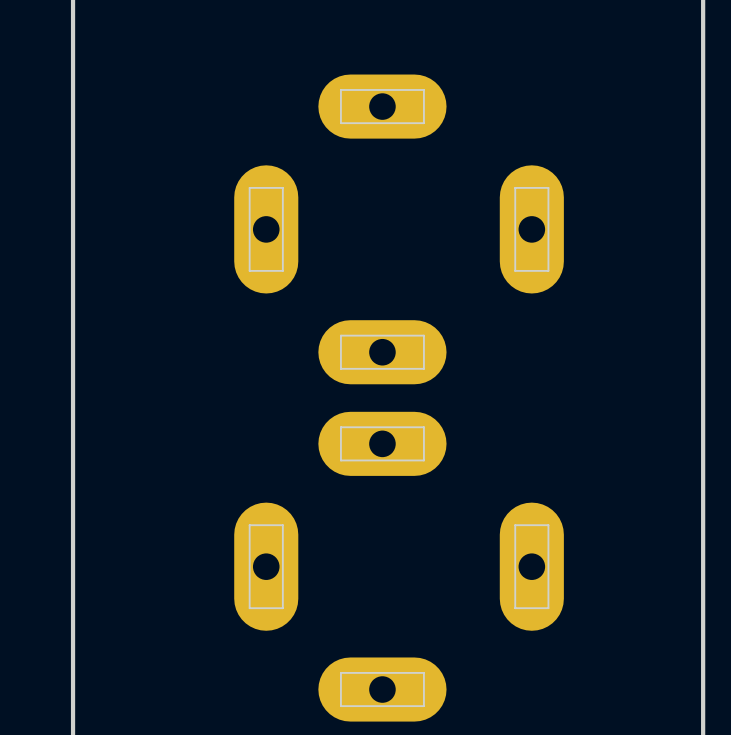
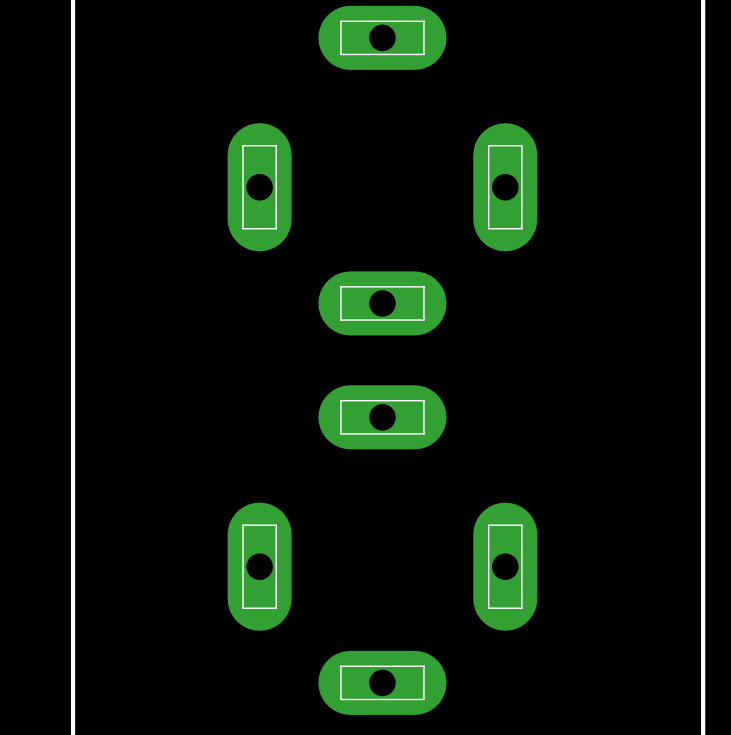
part rotation: 0° (399, 229) -> 90° counterclockwise (382, 170)
part rotation: 0° (399, 566) -> 90° counterclockwise (382, 550)

